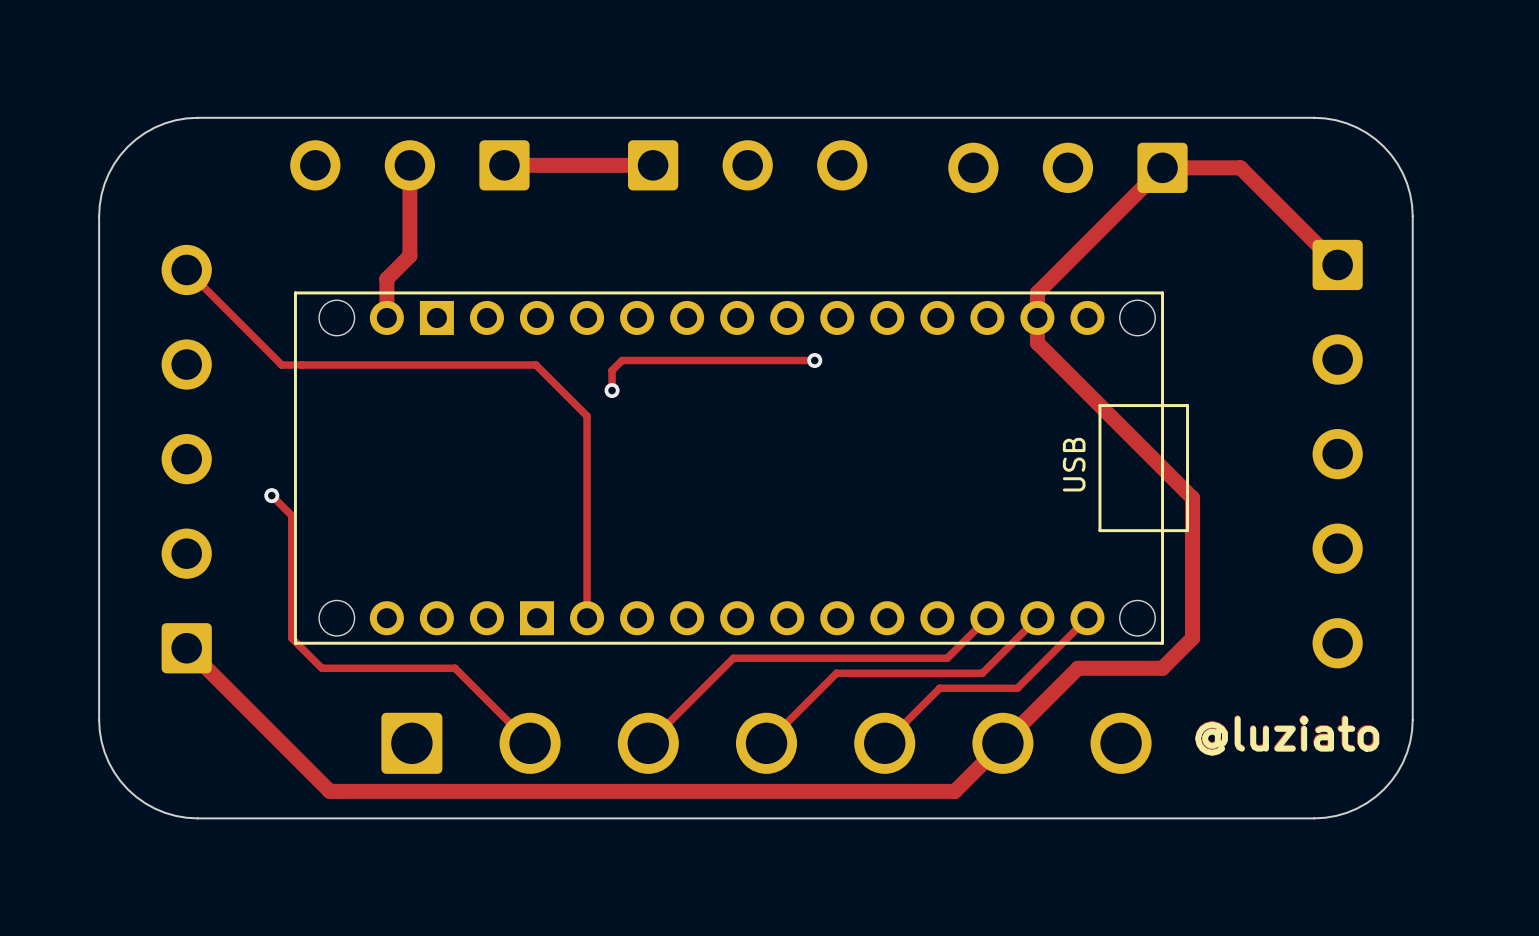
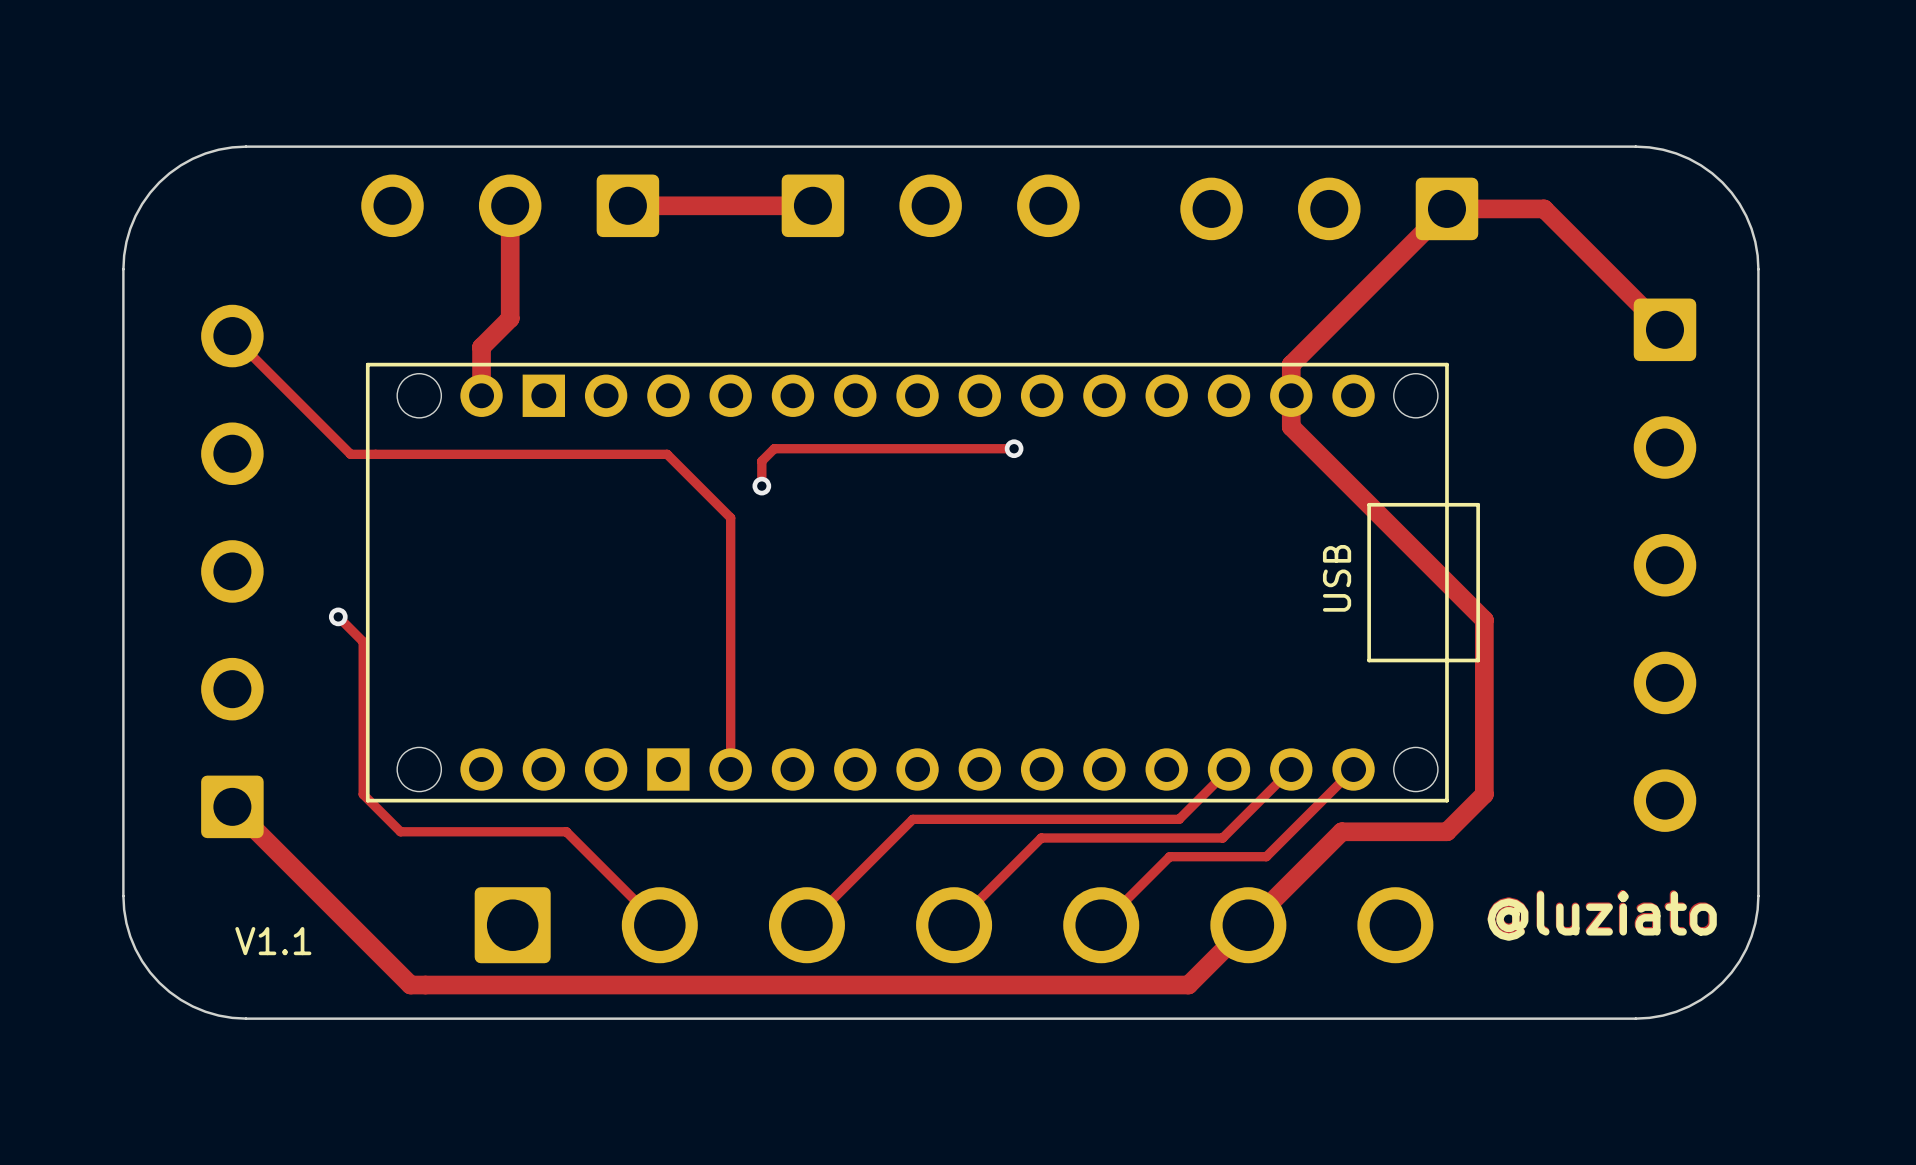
text: none -> V1.1 (273, 941)

